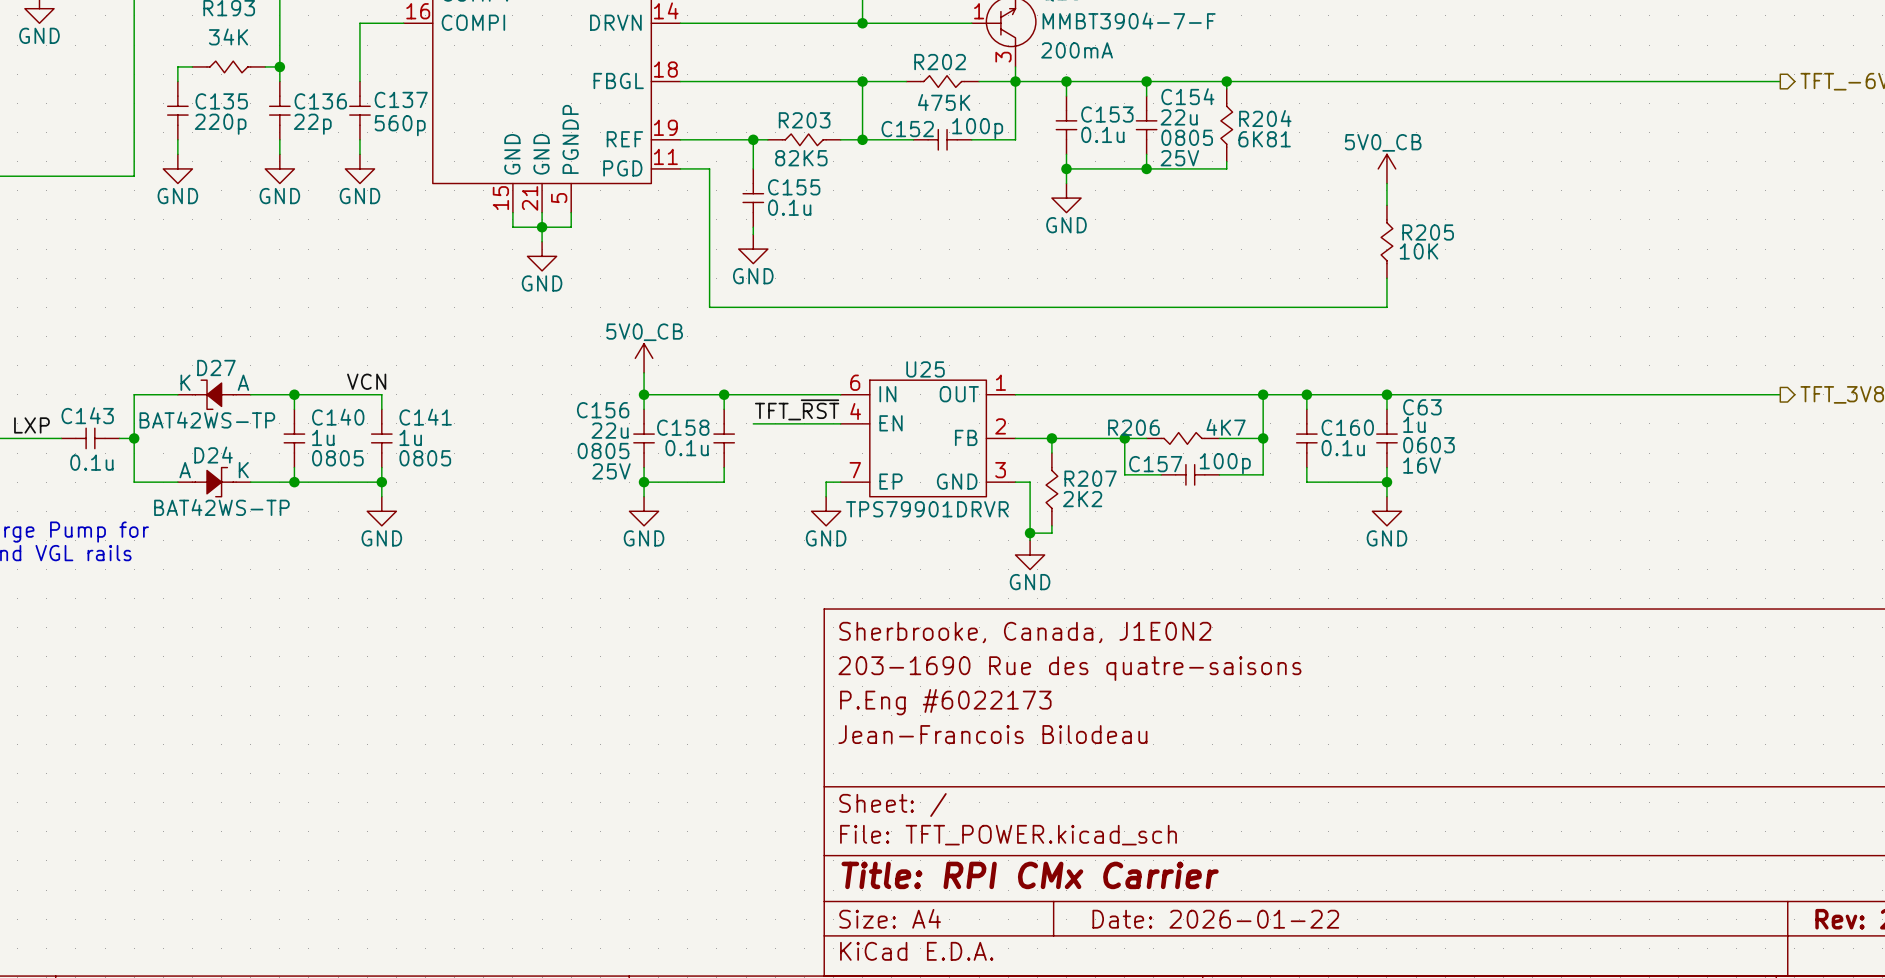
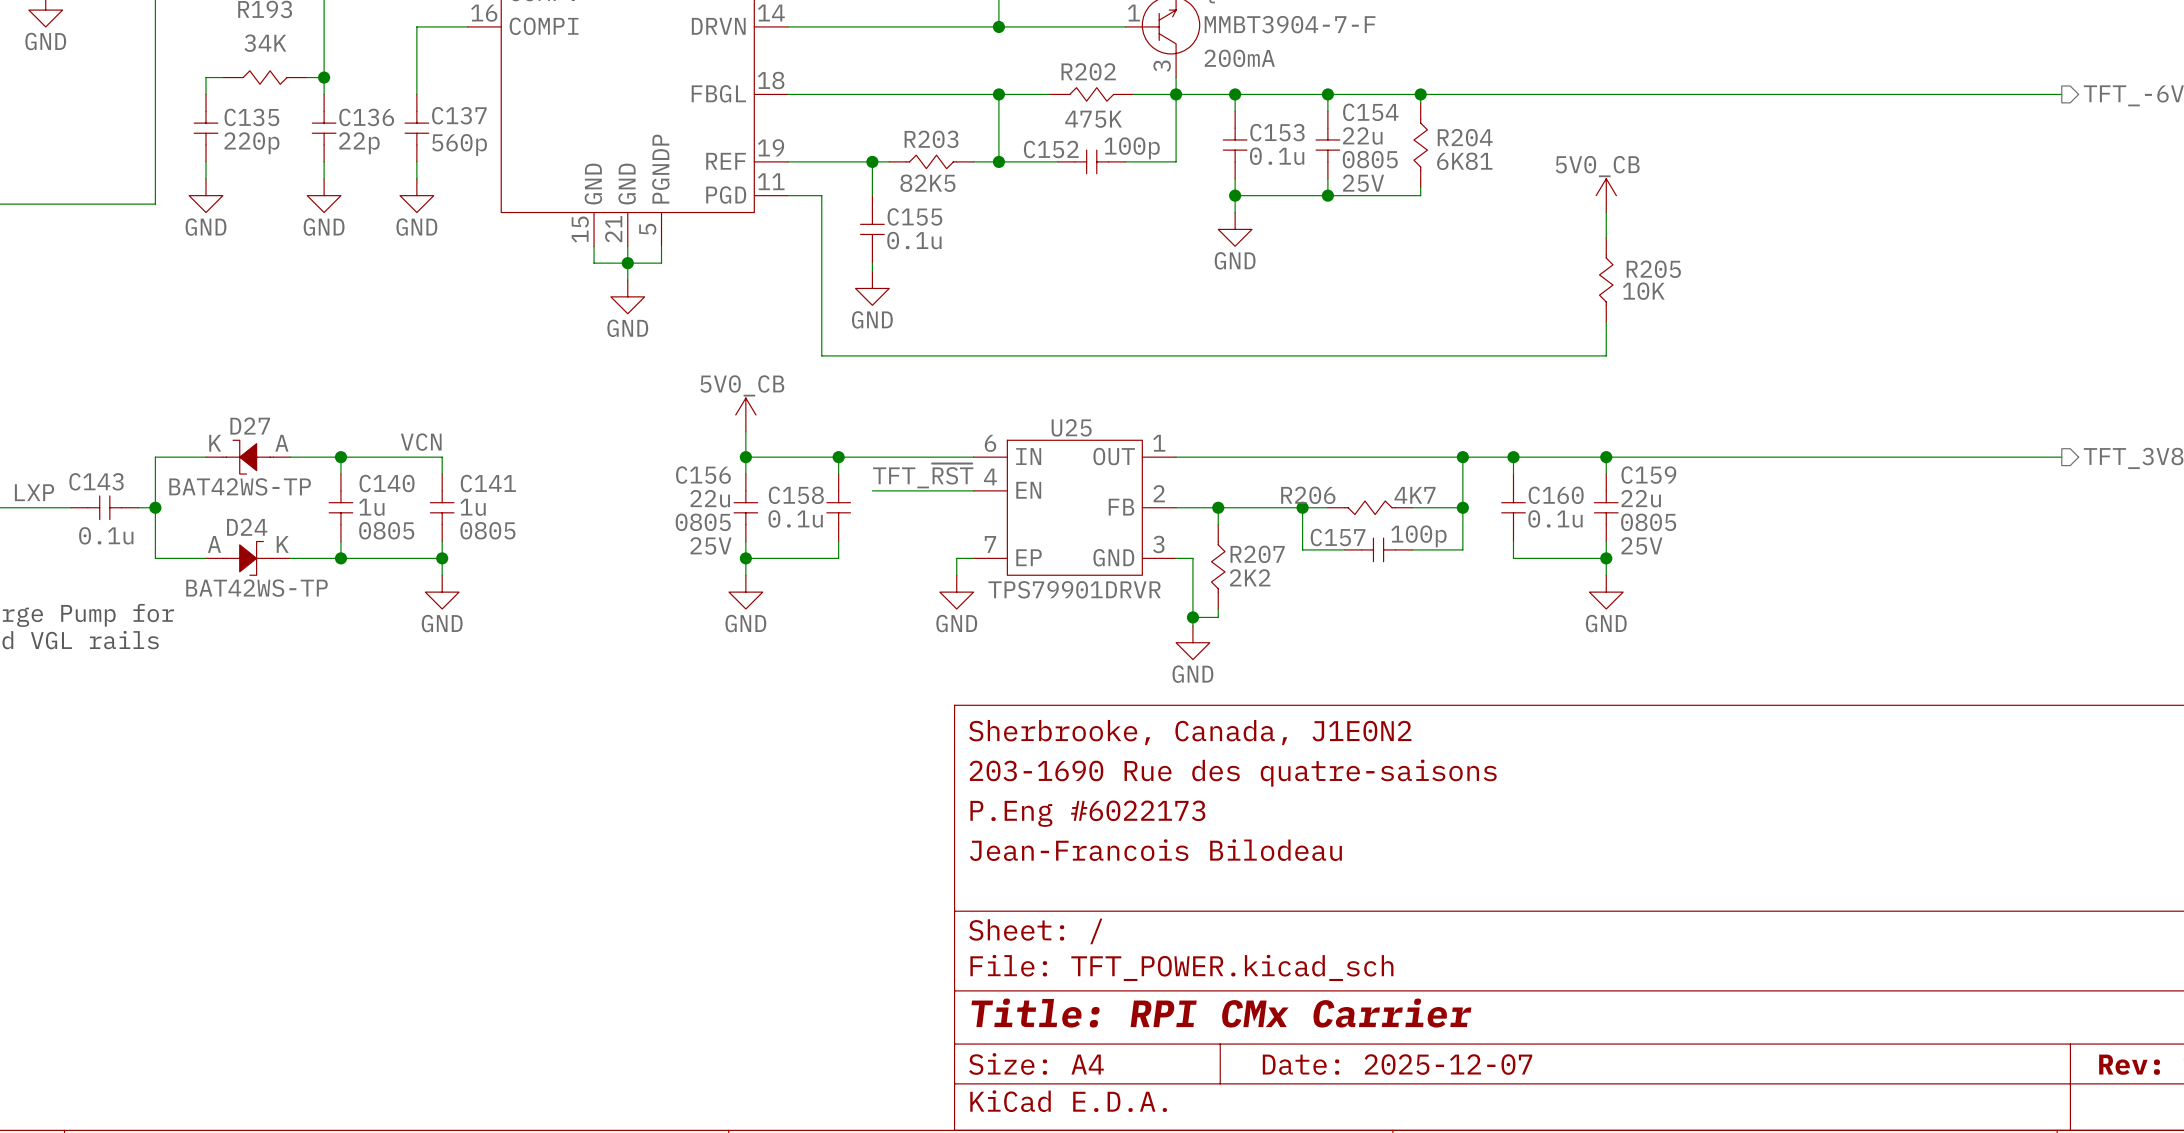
C63 name: C63 (1422, 407) -> C159 (1648, 475)
C63 value: 1u (1414, 424) -> 22u (1641, 498)
C63 text: 0603 (1428, 445) -> 0805 (1648, 522)
C63 text: 16V (1422, 465) -> 25V (1641, 545)
title block: Date: 2026-01-22 (1215, 919) -> Date: 2025-12-07 (1397, 1064)

